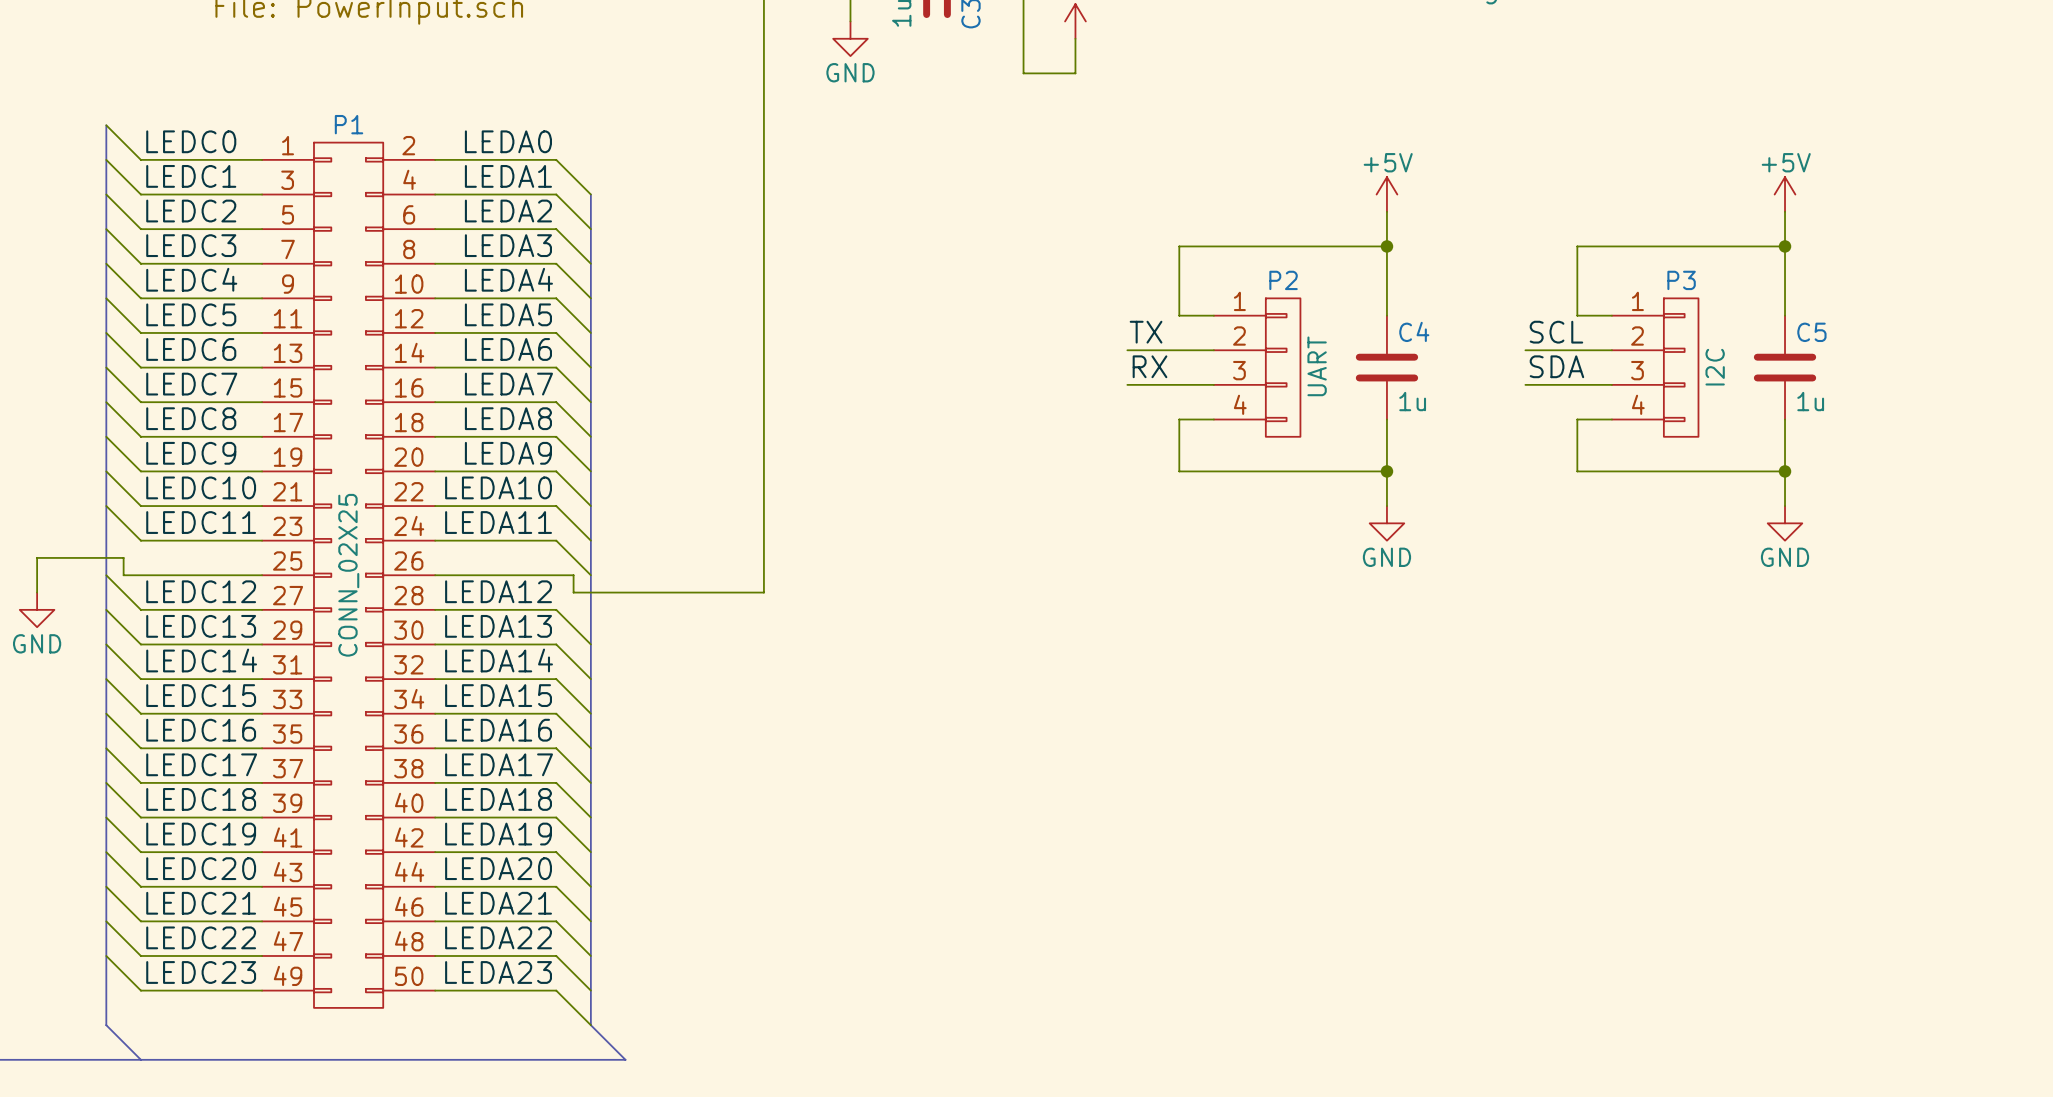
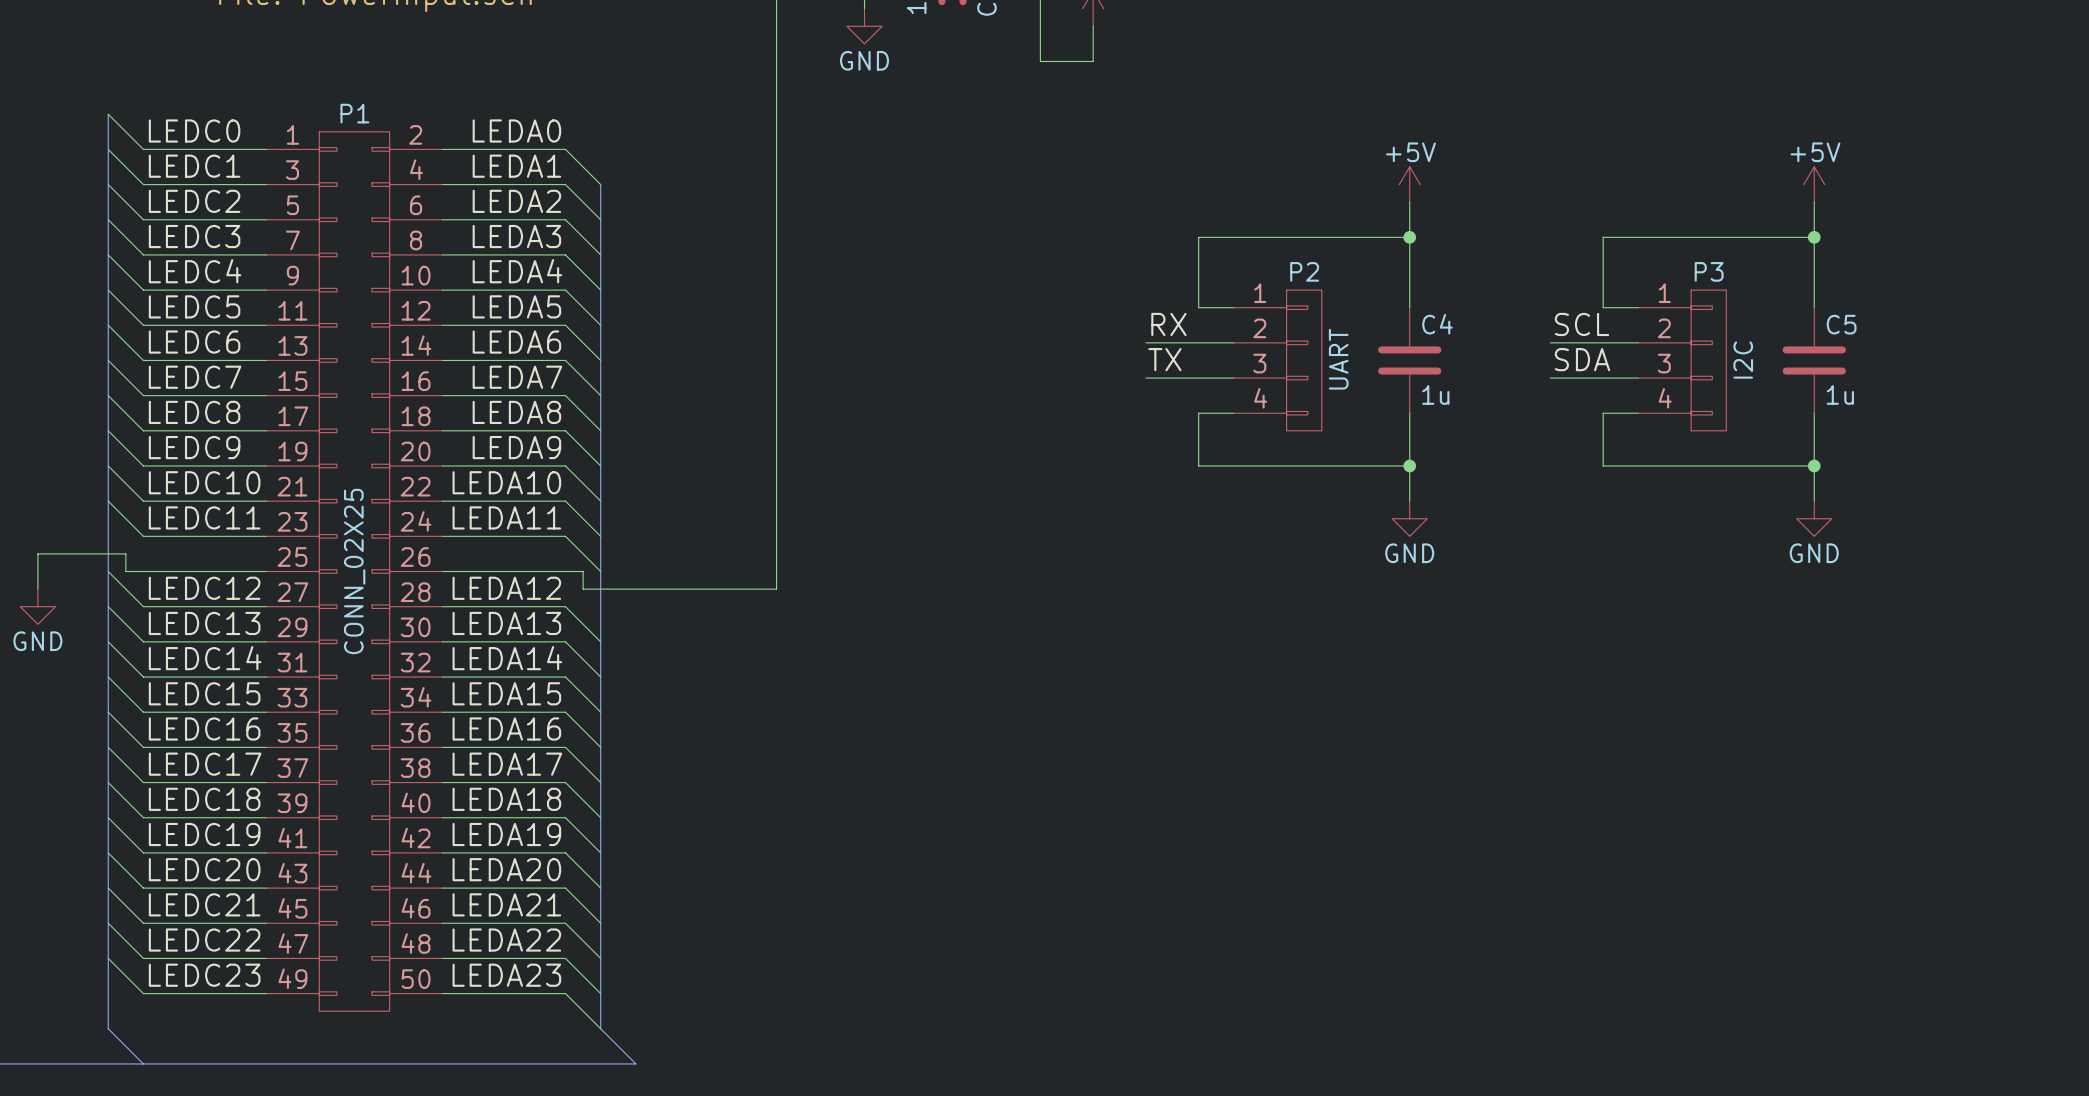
label: TX (1146, 332) -> RX (1168, 324)
label: RX (1150, 366) -> TX (1164, 359)

